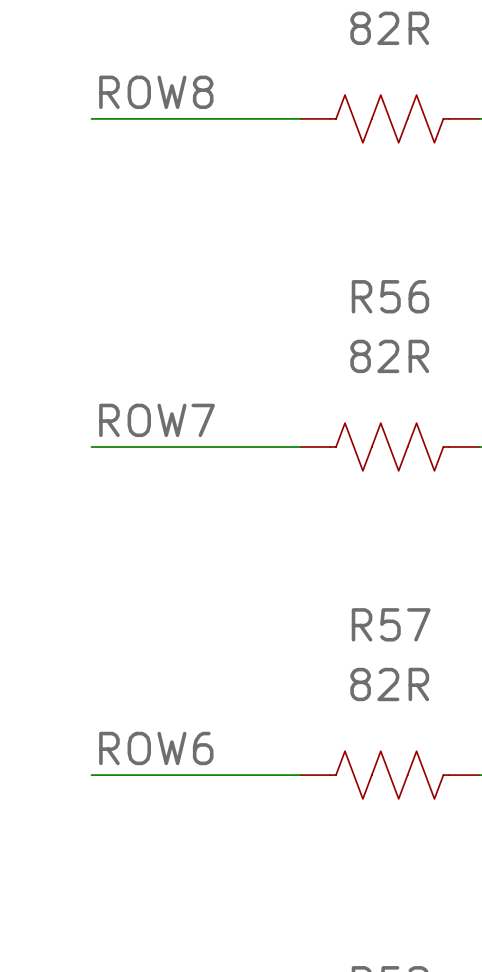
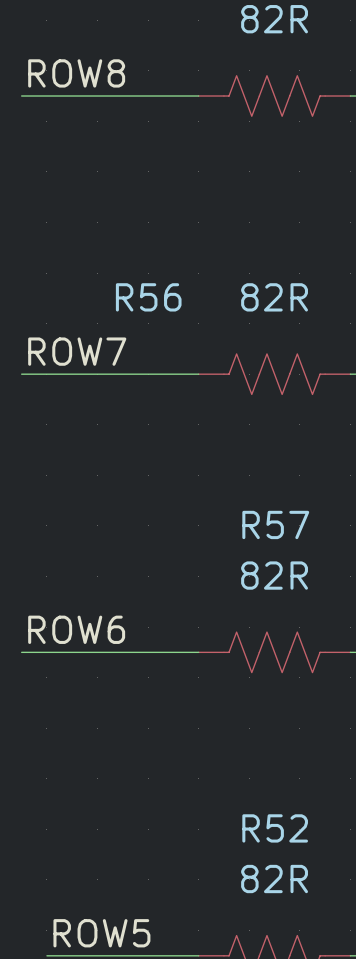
R56 name position: R56 (390, 296) -> R56 (148, 297)

